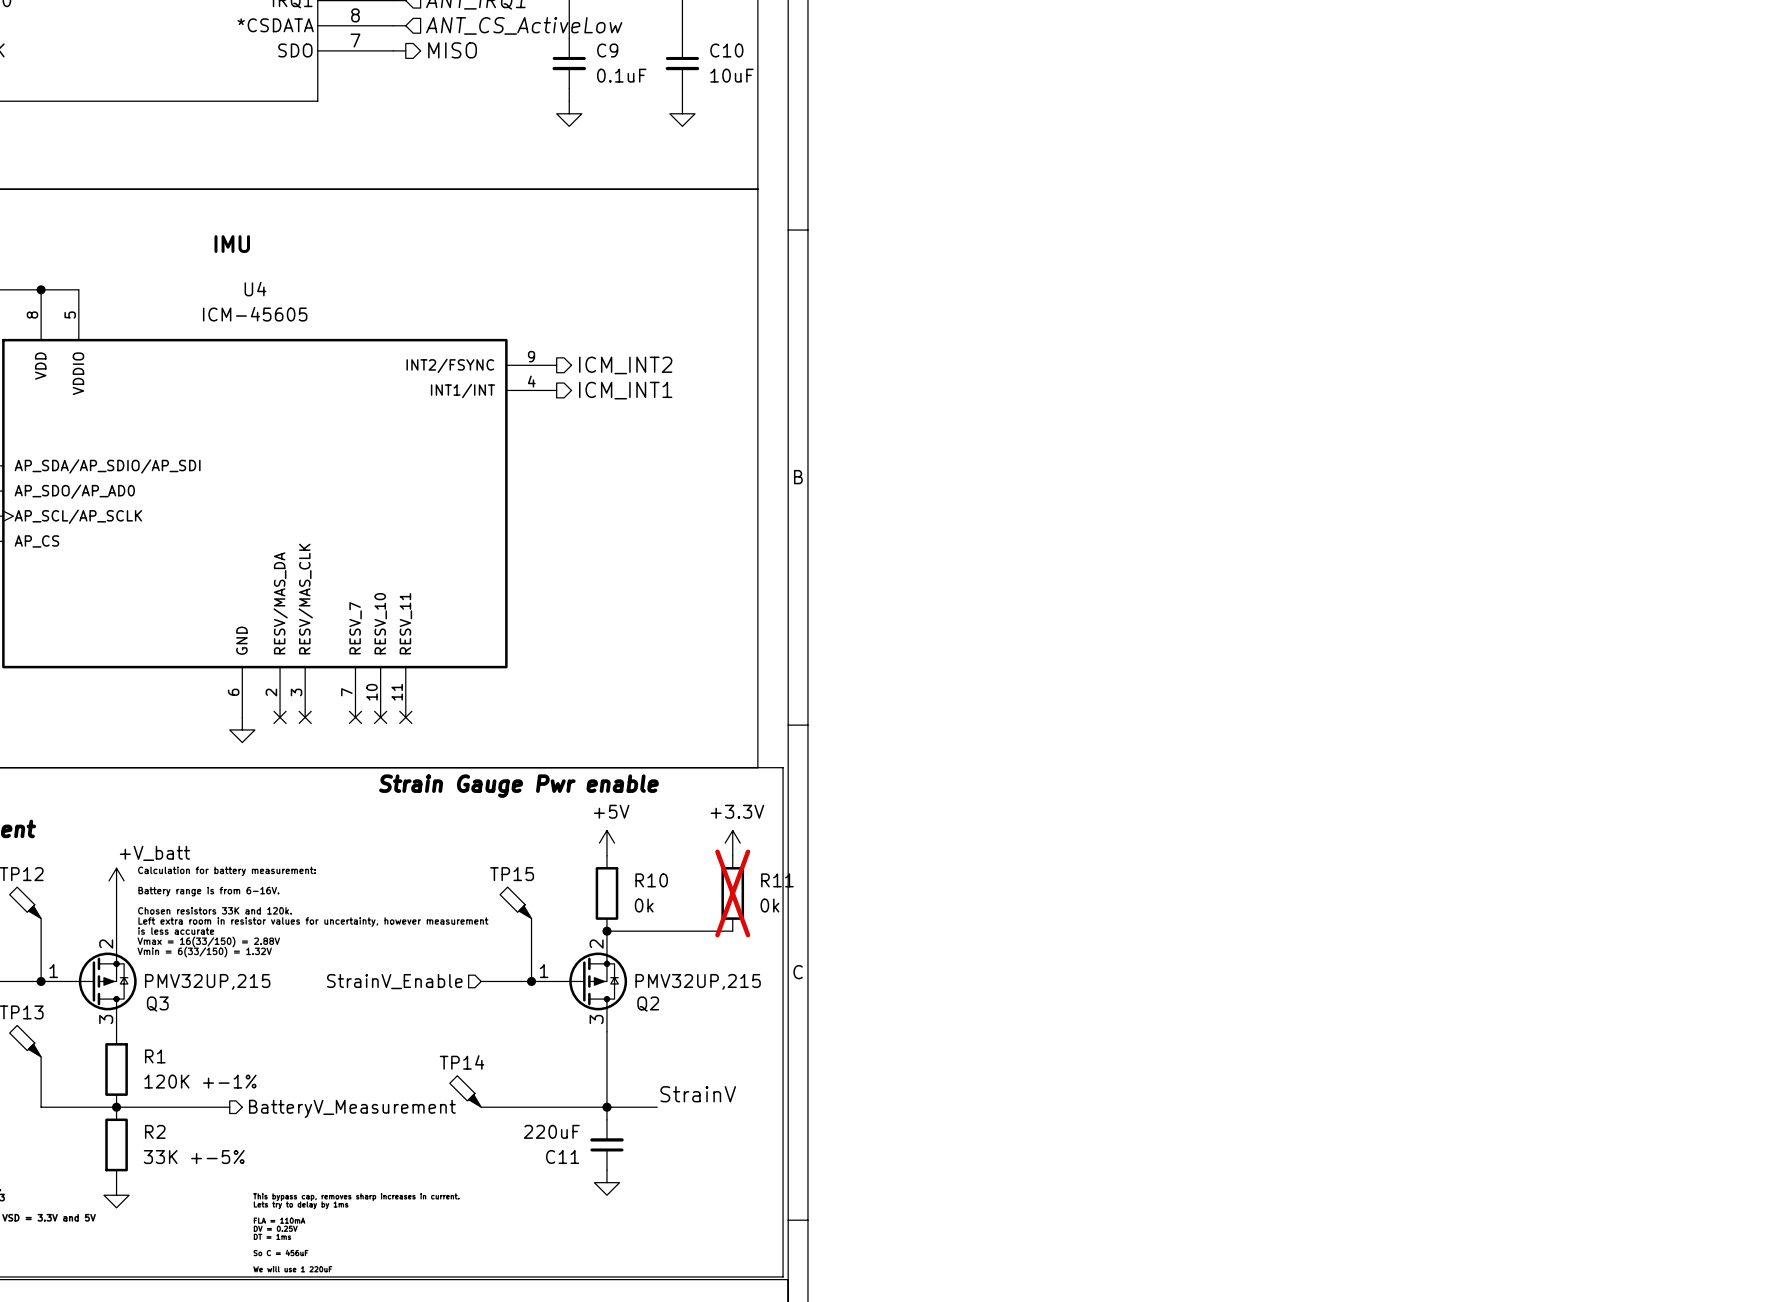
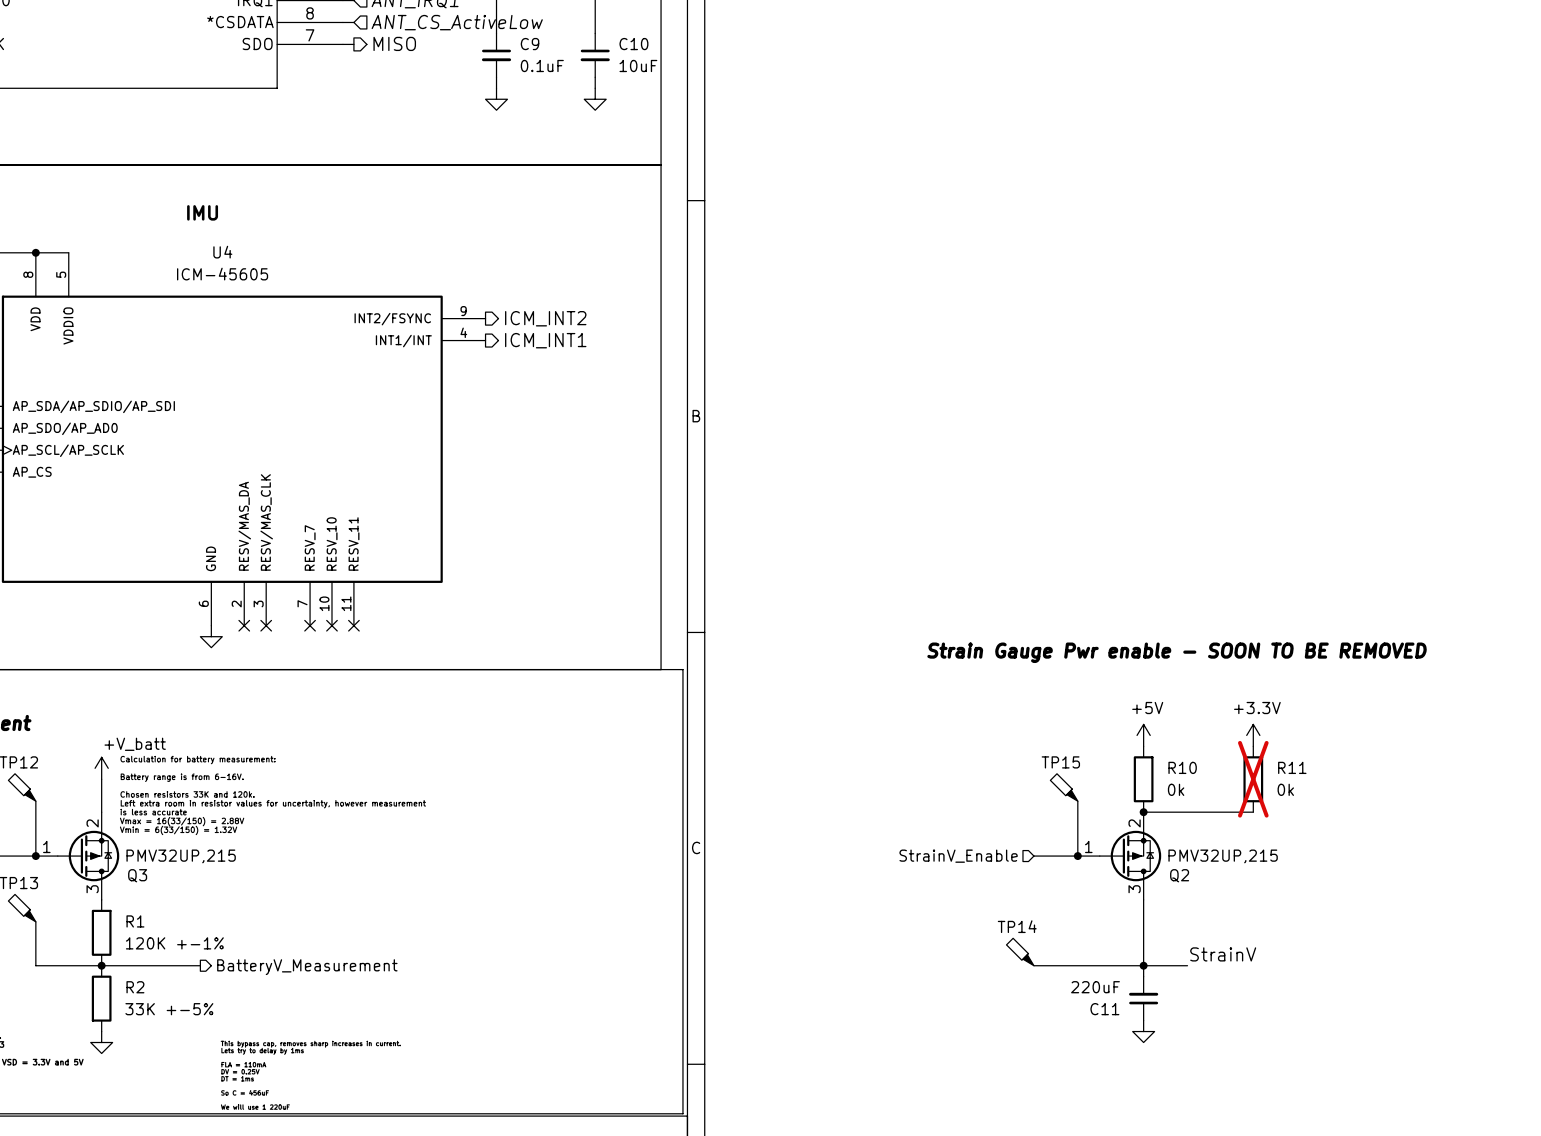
text: none -> Strain Gauge Pwr enable - SOON TO BE REMOVED (1177, 652)
text: Strain Gauge Pwr enable (518, 786) -> none
power symbol: +5V (606, 843) -> none
power symbol: +3.3V (732, 843) -> none
power symbol: none -> +5V (1143, 735)
power symbol: none -> +3.3V (1253, 735)
R10 position: (606, 893) -> (1143, 779)
R11 position: (732, 893) -> (1253, 779)
TP15 position: (515, 902) -> (1064, 787)
wire: (531, 918) (531, 981) (481, 981) -> none
wire: none -> (1077, 801) (1077, 856) (1033, 856)
wire: (606, 931) (732, 931) -> none
junction: (606, 931) -> none
wire: none -> (1143, 812) (1253, 812)
junction: none -> (1143, 812)
hierarchical label: StrainV_Enable (394, 981) -> none
junction: (531, 981) -> none
Q2 position: (579, 981) -> (1119, 856)
hierarchical label: none -> StrainV_Enable (958, 856)
junction: none -> (1077, 856)
wire: (606, 1031) (606, 1119) -> none
wire: none -> (1143, 899) (1143, 976)
TP14 position: (465, 1091) -> (1020, 952)
label: StrainV (698, 1094) -> none
label: none -> StrainV (1223, 954)
wire: (481, 1107) (657, 1107) -> none
junction: (606, 1107) -> none
wire: none -> (1033, 965) (1187, 965)
junction: none -> (1143, 965)
C11 position: (606, 1144) -> (1143, 998)
power symbol: (606, 1182) -> none
power symbol: none -> (1143, 1031)

